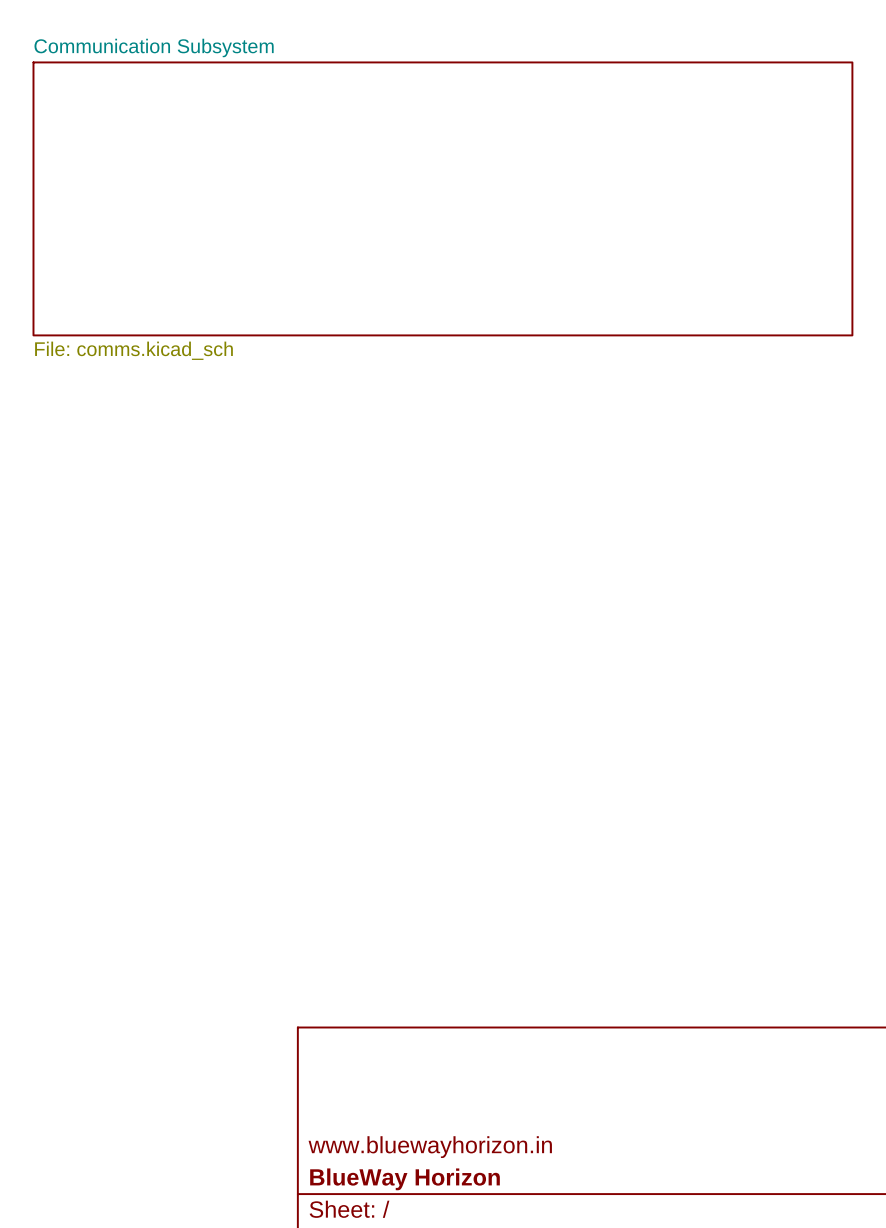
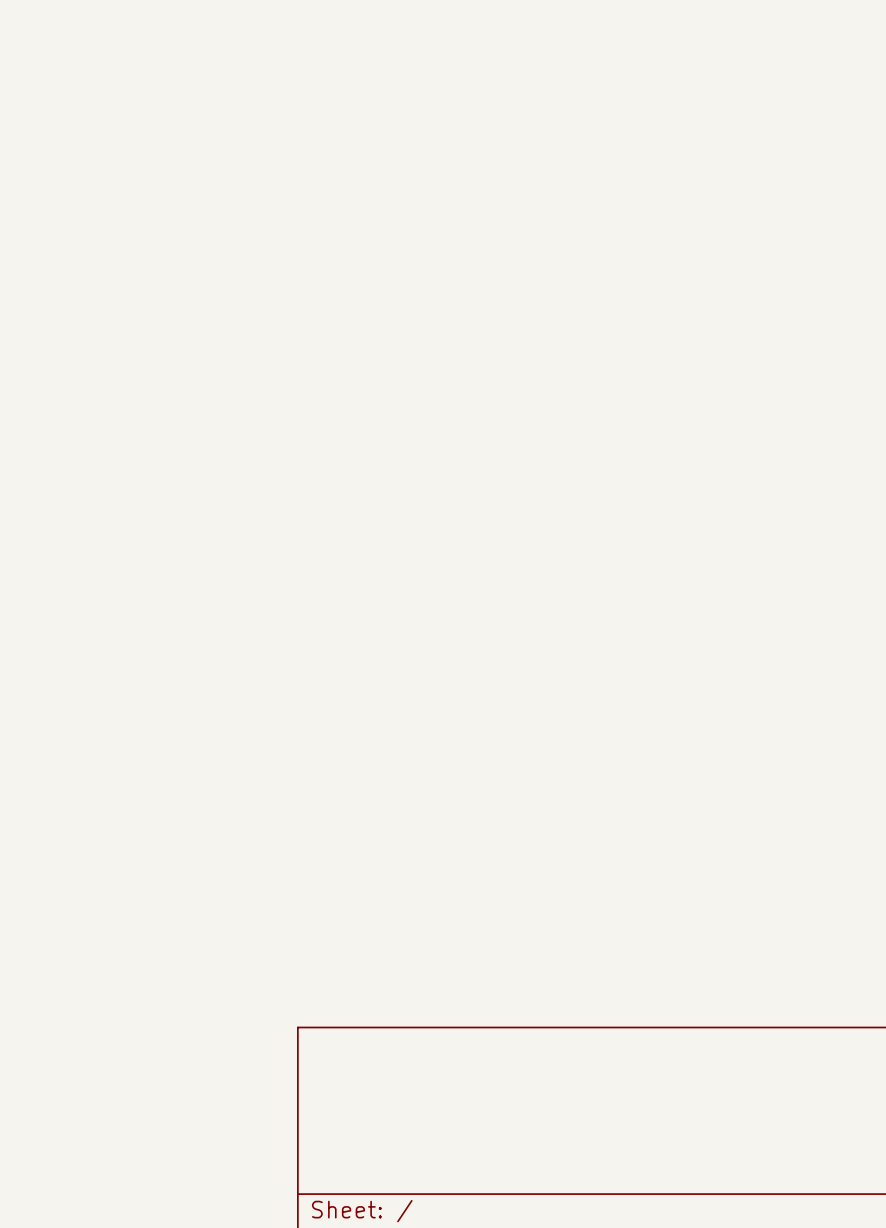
sheet Communication Subsystem: File: comms.kicad_sch (442, 198) -> none
title block: www.bluewayhorizon.in (430, 1147) -> none
title block: BlueWay Horizon (405, 1179) -> none

